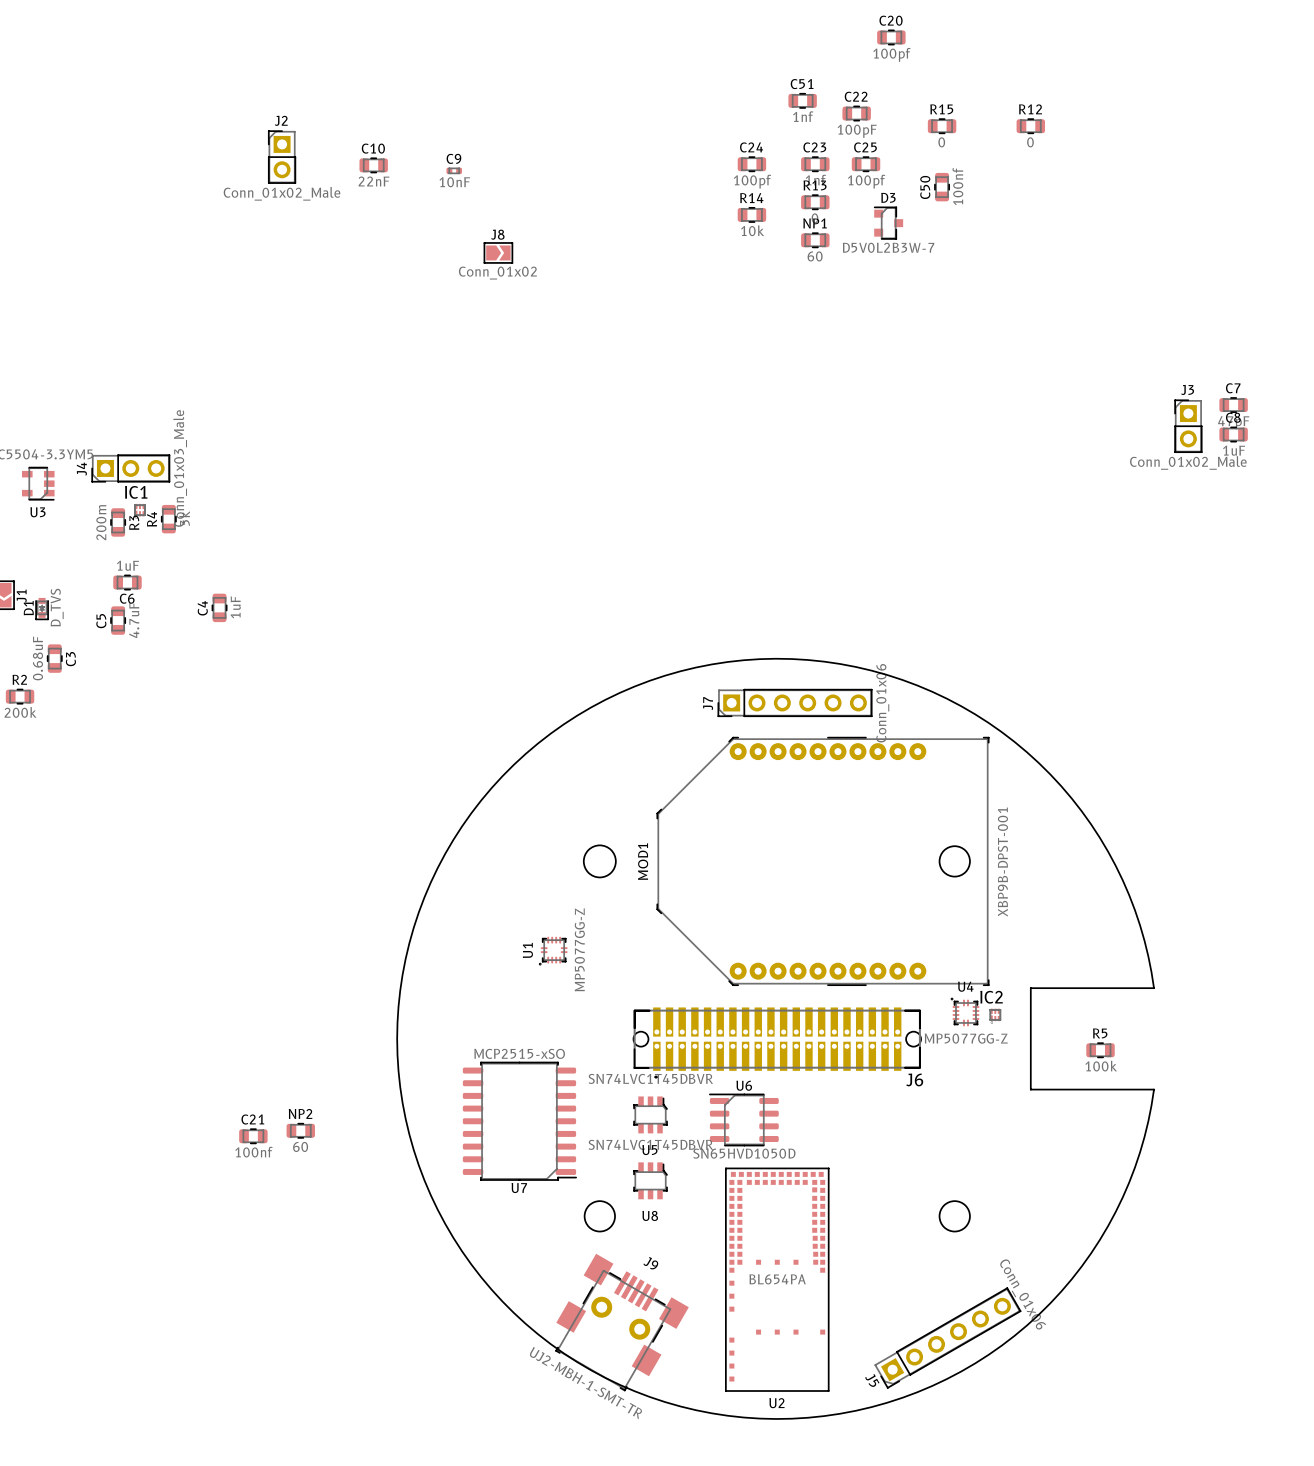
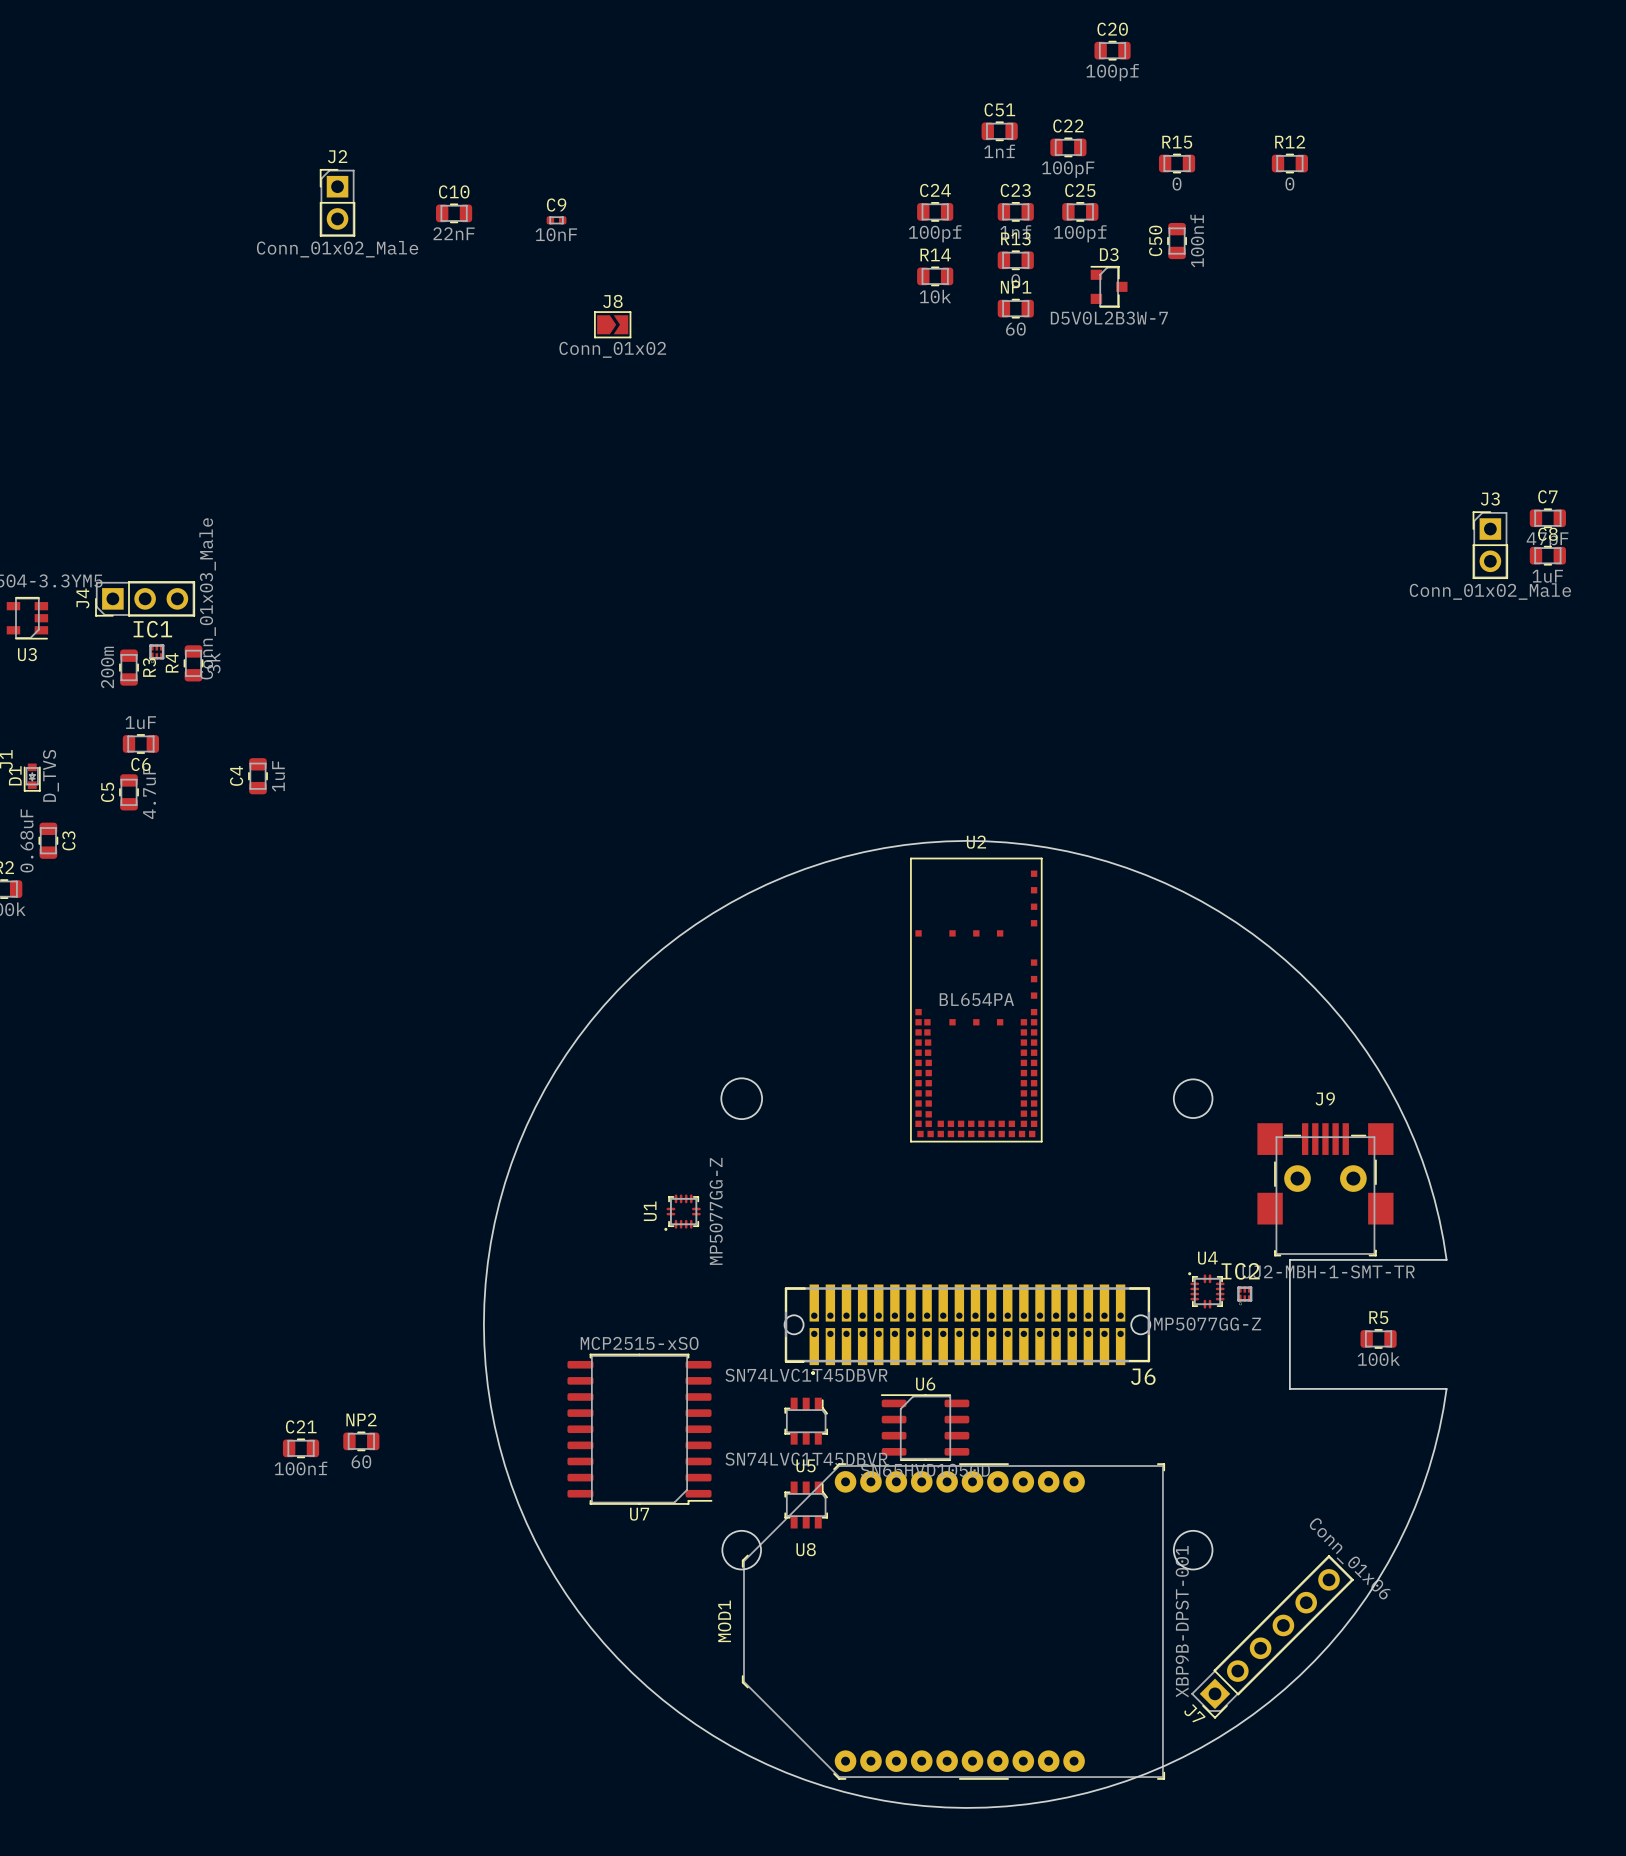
J7 rotation: 0° (795, 702) -> 45° counterclockwise (1272, 1636)
J7 position: (795, 702) -> (1272, 1636)
MOD1 position: (822, 861) -> (953, 1621)
U2 rotation: 0° (777, 1279) -> 180° (976, 1000)
U2 position: (777, 1279) -> (976, 1000)
J9 rotation: 0° (622, 1322) -> 30° counterclockwise (1325, 1189)
J9 position: (622, 1322) -> (1325, 1189)
J5: Conn_01x06 (947, 1338) -> none

